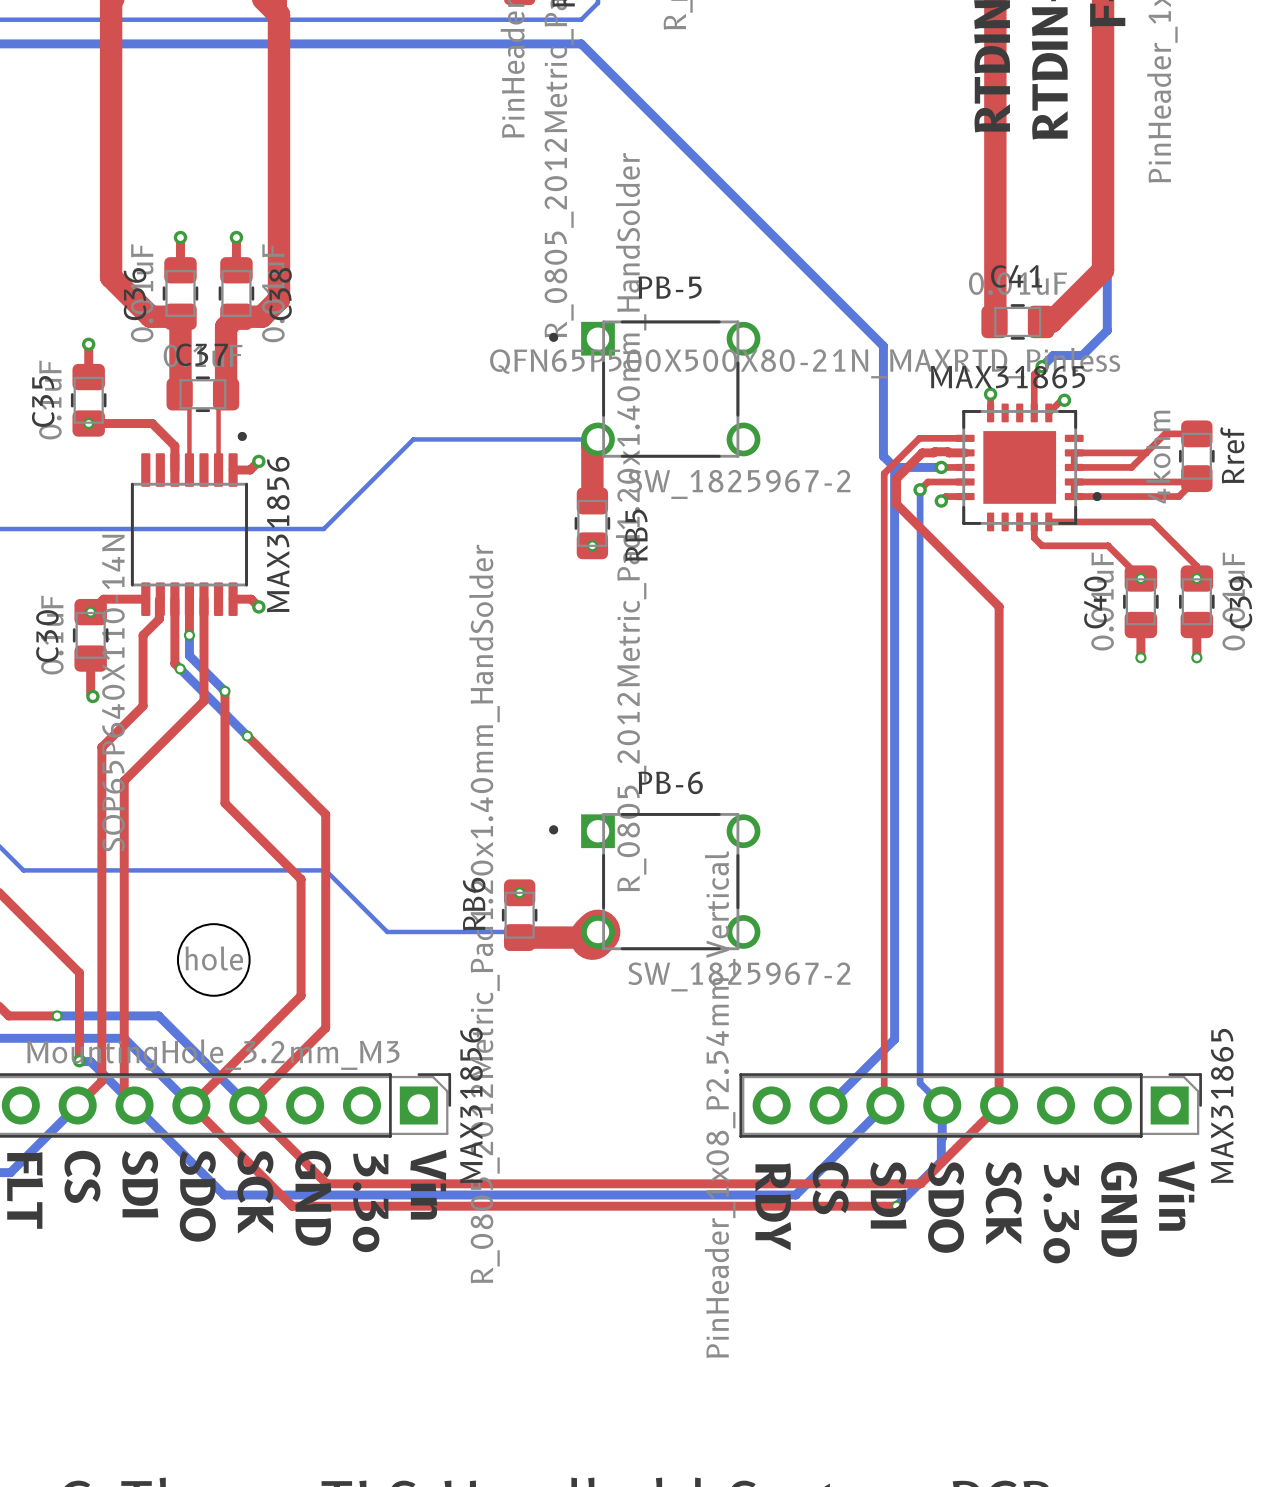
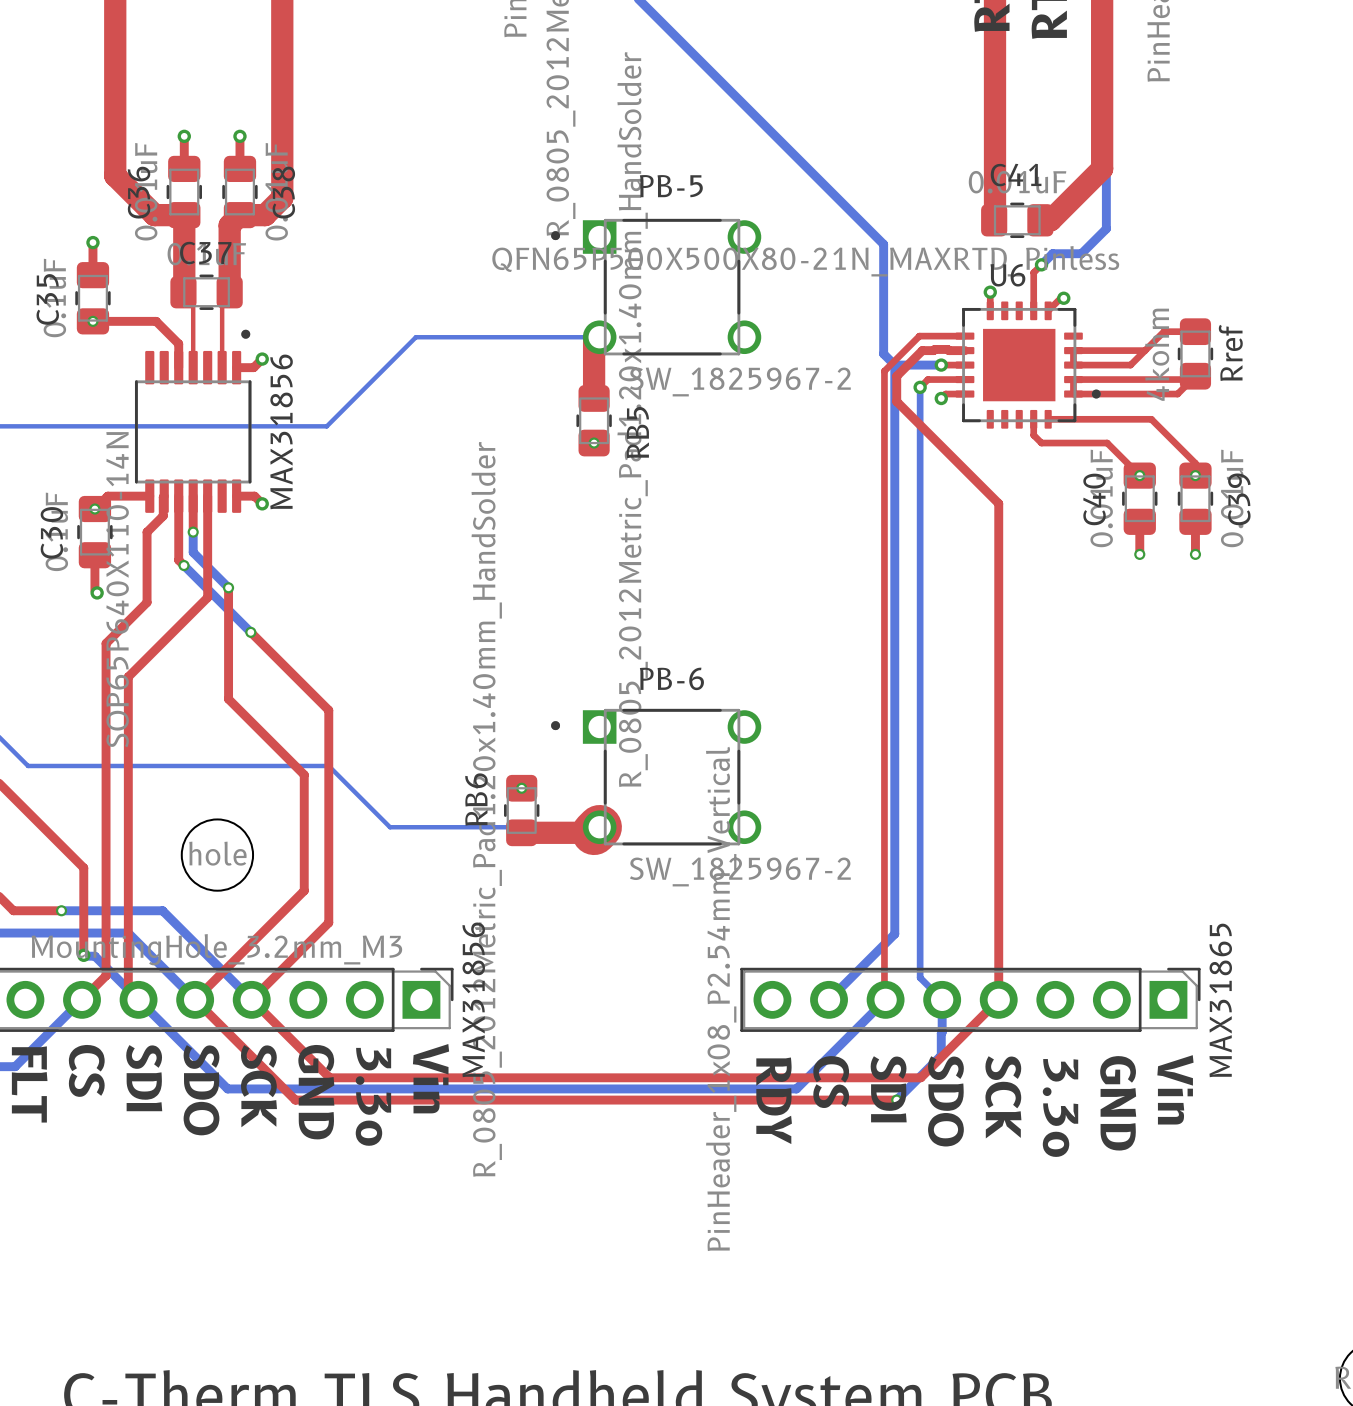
MAX31865 name: MAX31865 (1007, 377) -> U6 (1007, 275)

